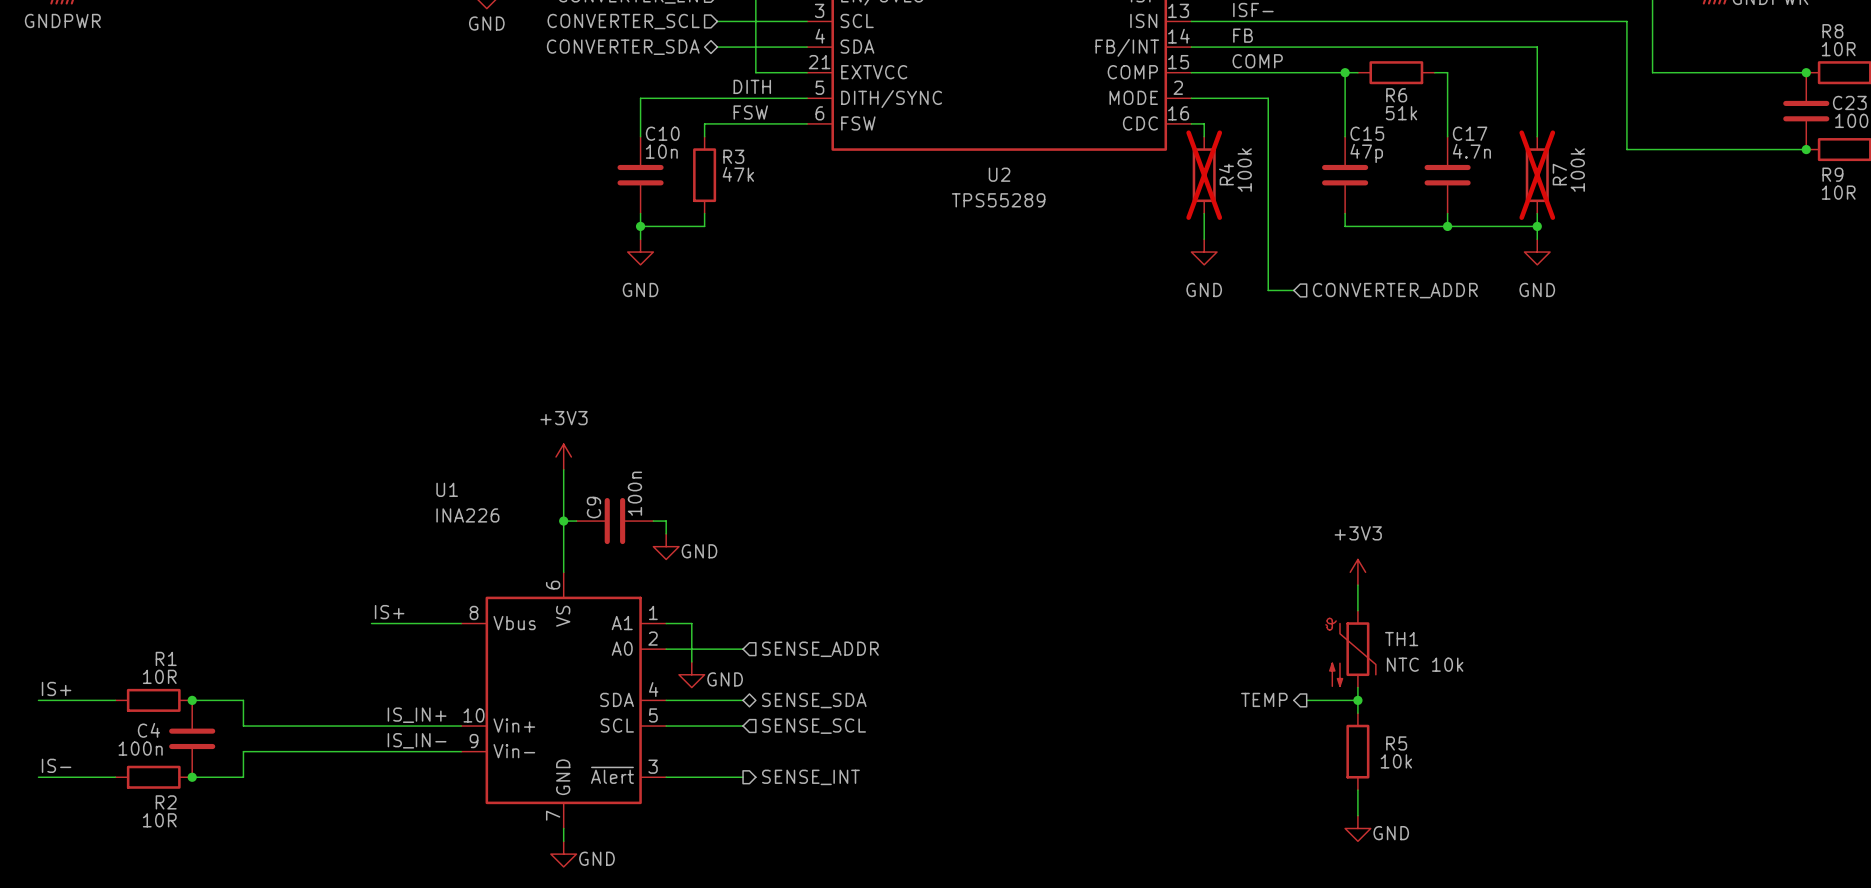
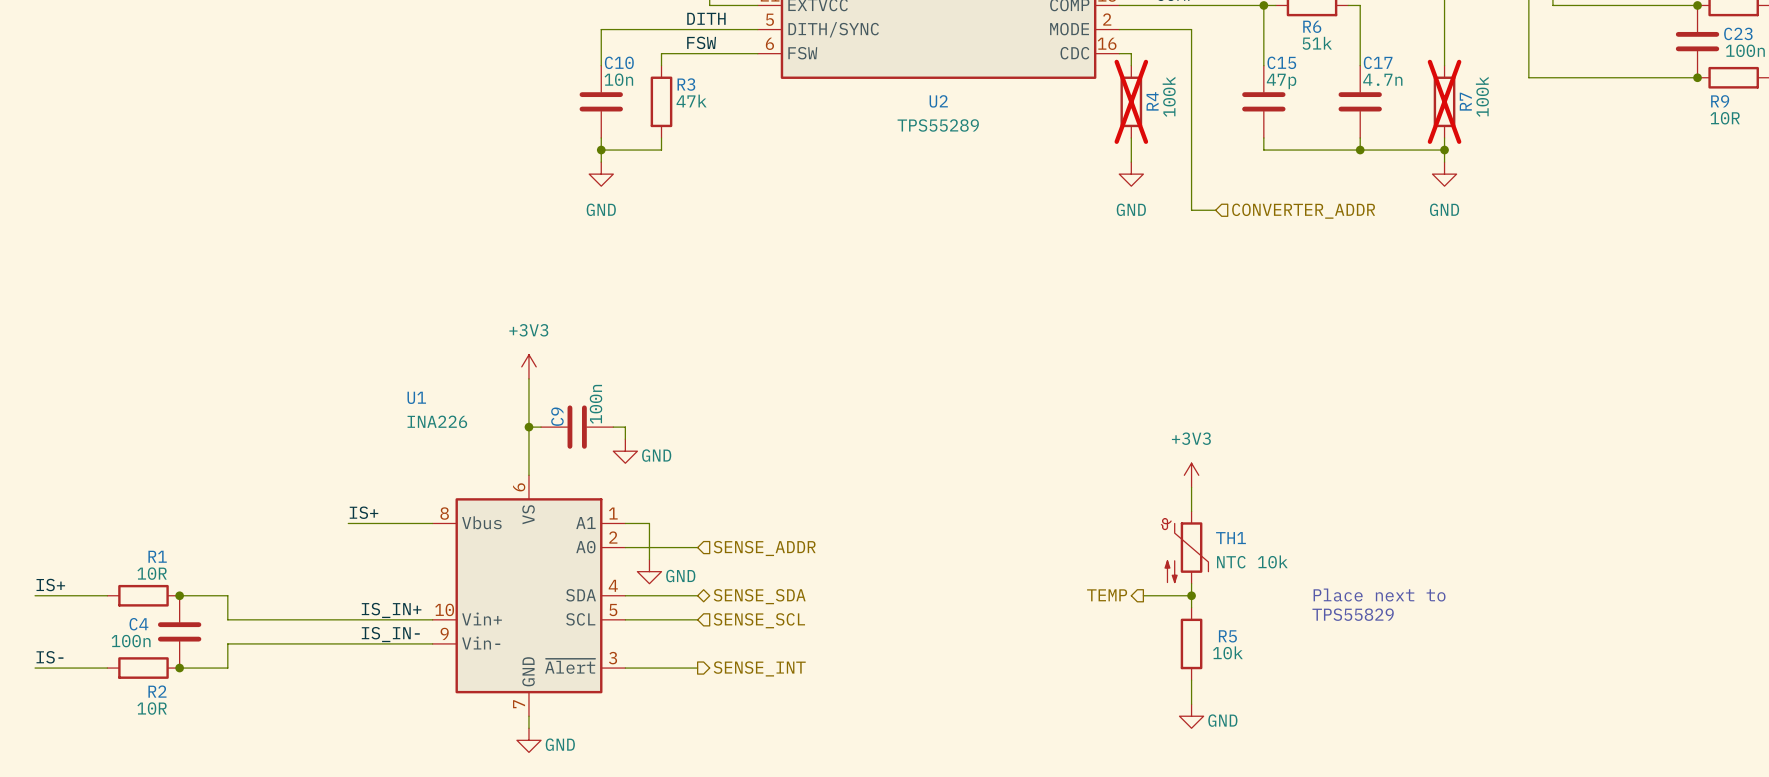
power symbol position: +3V3 (1357, 572) -> +3V3 (1191, 475)
wire: (1357, 585) (1357, 610) -> (1191, 487) (1191, 511)
TH1 position: (1350, 649) -> (1184, 547)
wire: (1357, 687) (1357, 713) -> (1191, 583) (1191, 607)
hierarchical label position: TEMP (1264, 699) -> TEMP (1107, 595)
text: none -> Place next to (1379, 595)
junction: none -> (1191, 595)
wire: (1306, 700) (1357, 700) -> (1143, 595) (1191, 595)
junction: (1357, 700) -> none
text: none -> TPS55829 (1353, 614)
R5 position: (1357, 751) -> (1191, 643)
wire: (1357, 790) (1357, 815) -> (1191, 680) (1191, 704)
power symbol position: GND (1357, 828) -> GND (1191, 716)

